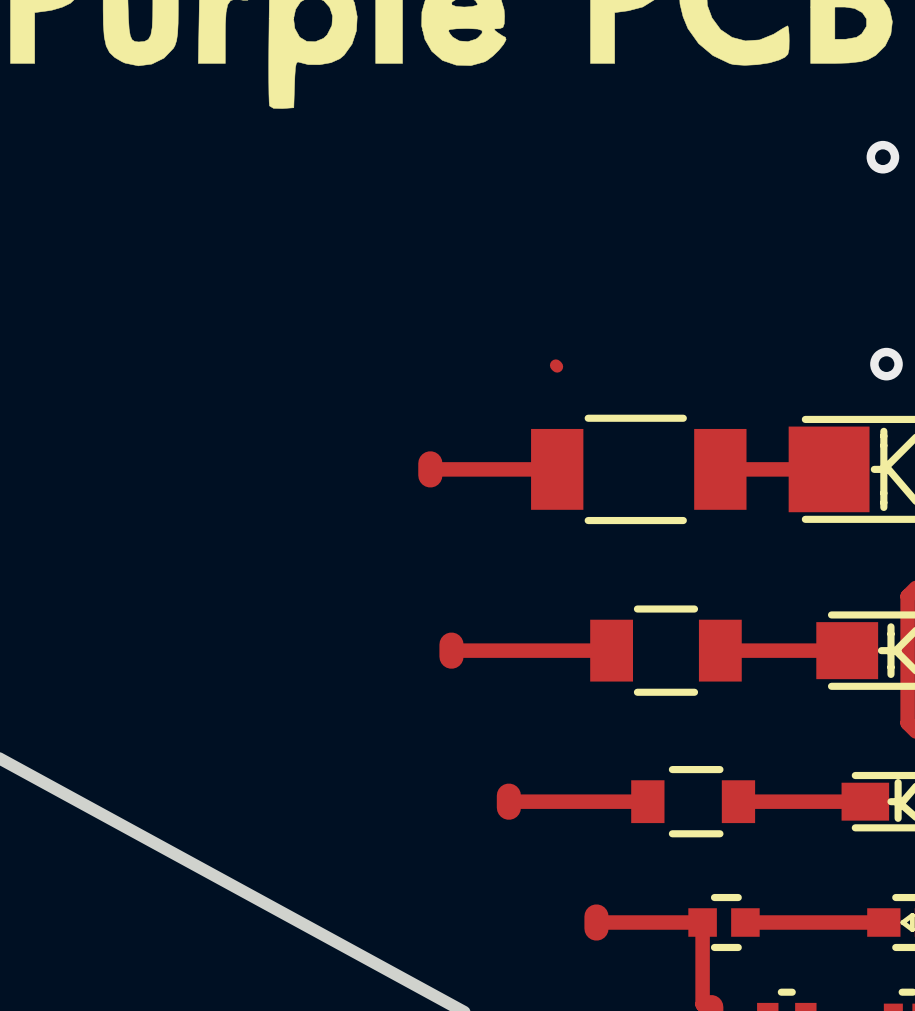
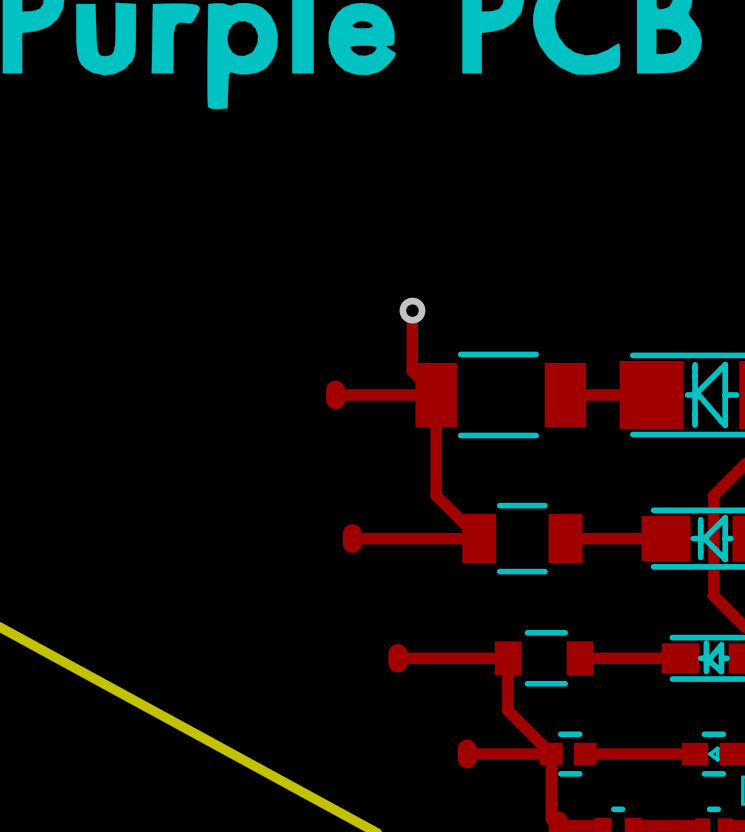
via: (882, 157) -> none
track: none -> (412, 309) (412, 371) (436, 394) (436, 495) (479, 538)
via: none -> (412, 310)
via: (886, 364) -> none
track: (555, 365) (557, 366) -> none
track: none -> (508, 658) (508, 710) (551, 754)

